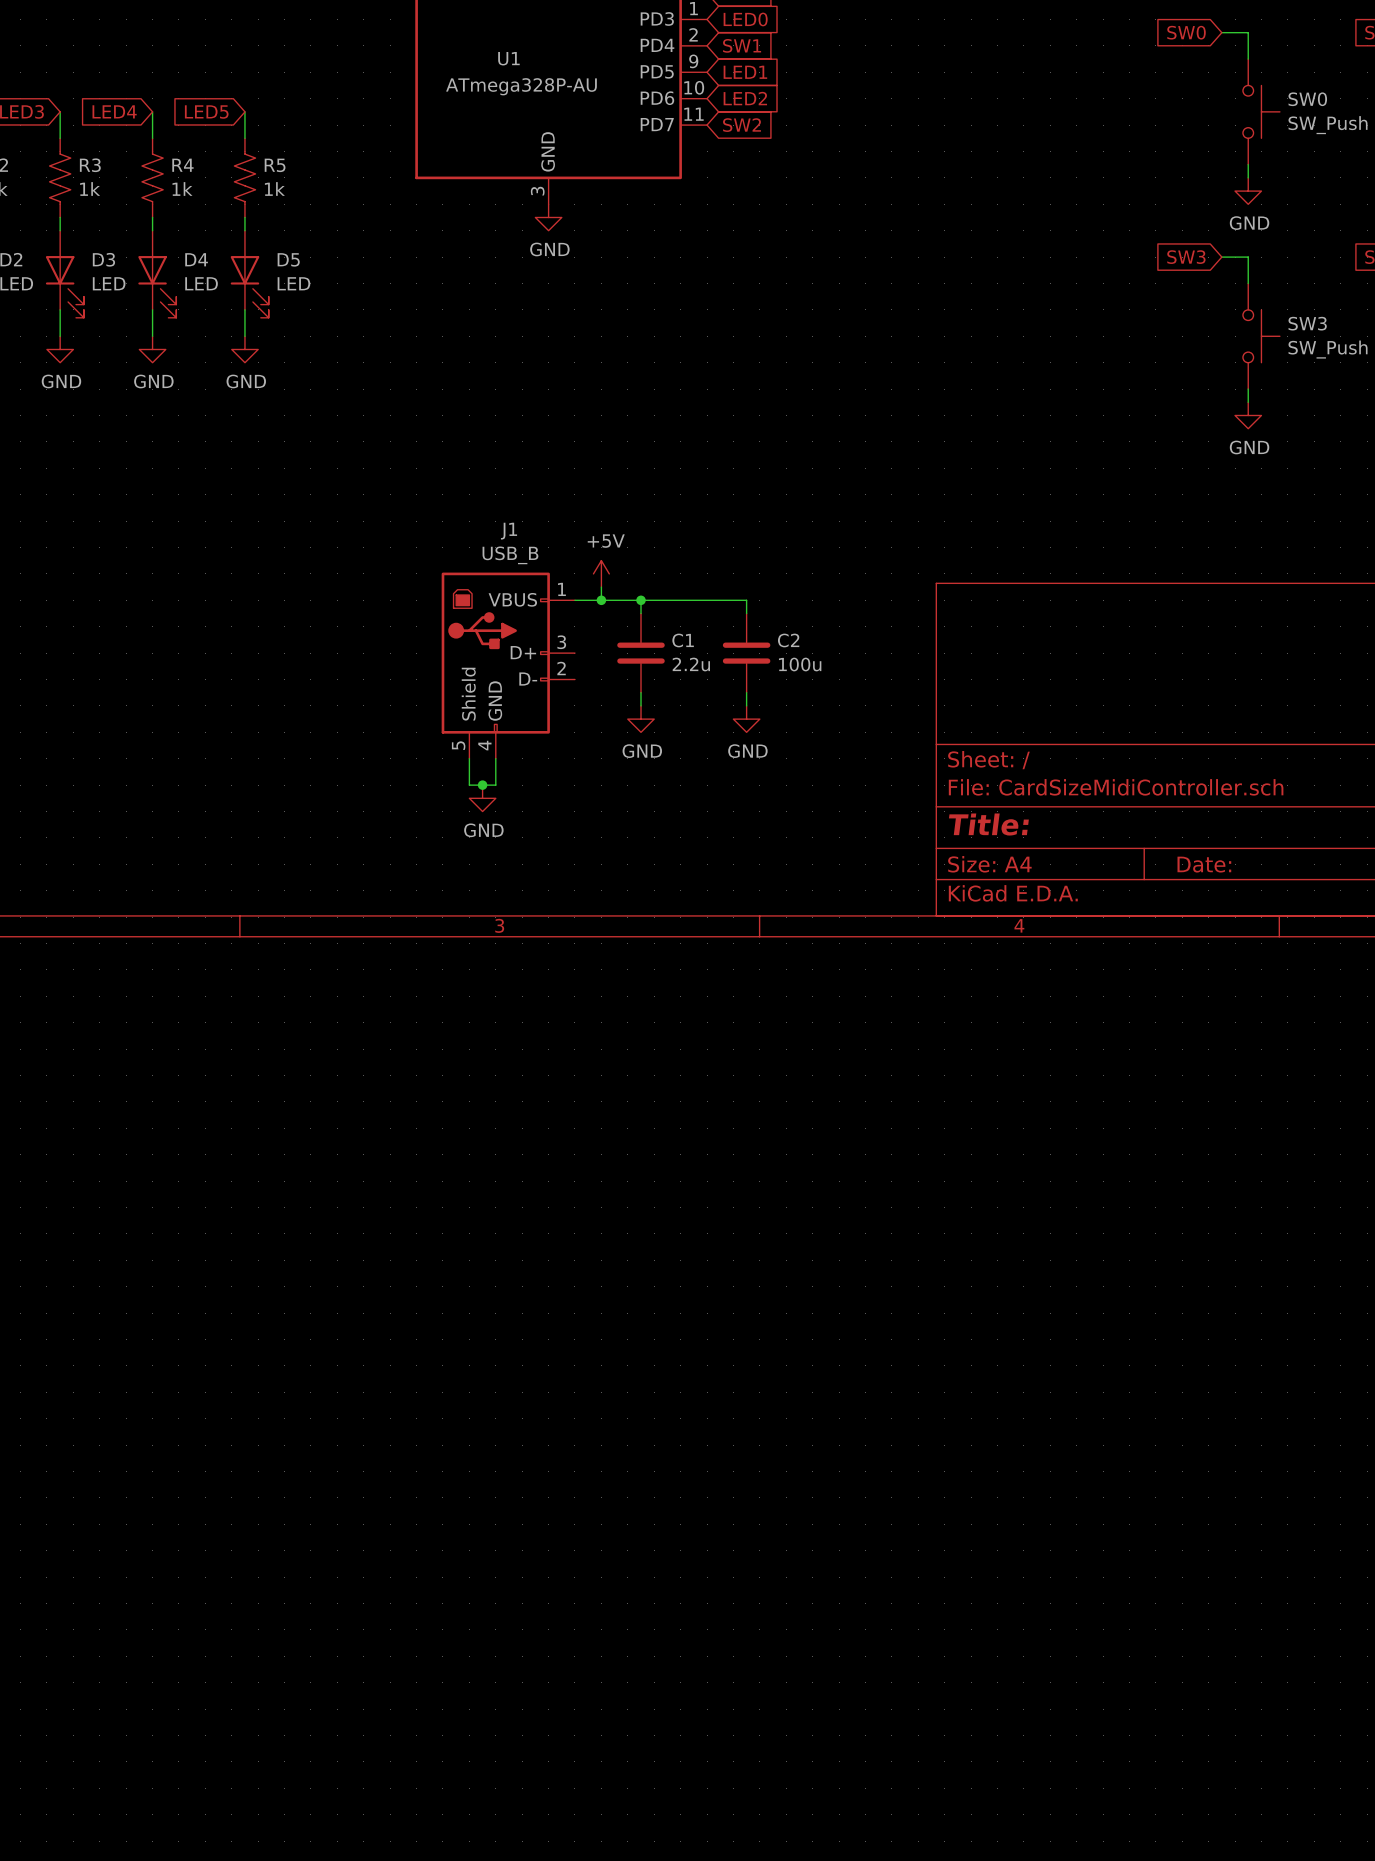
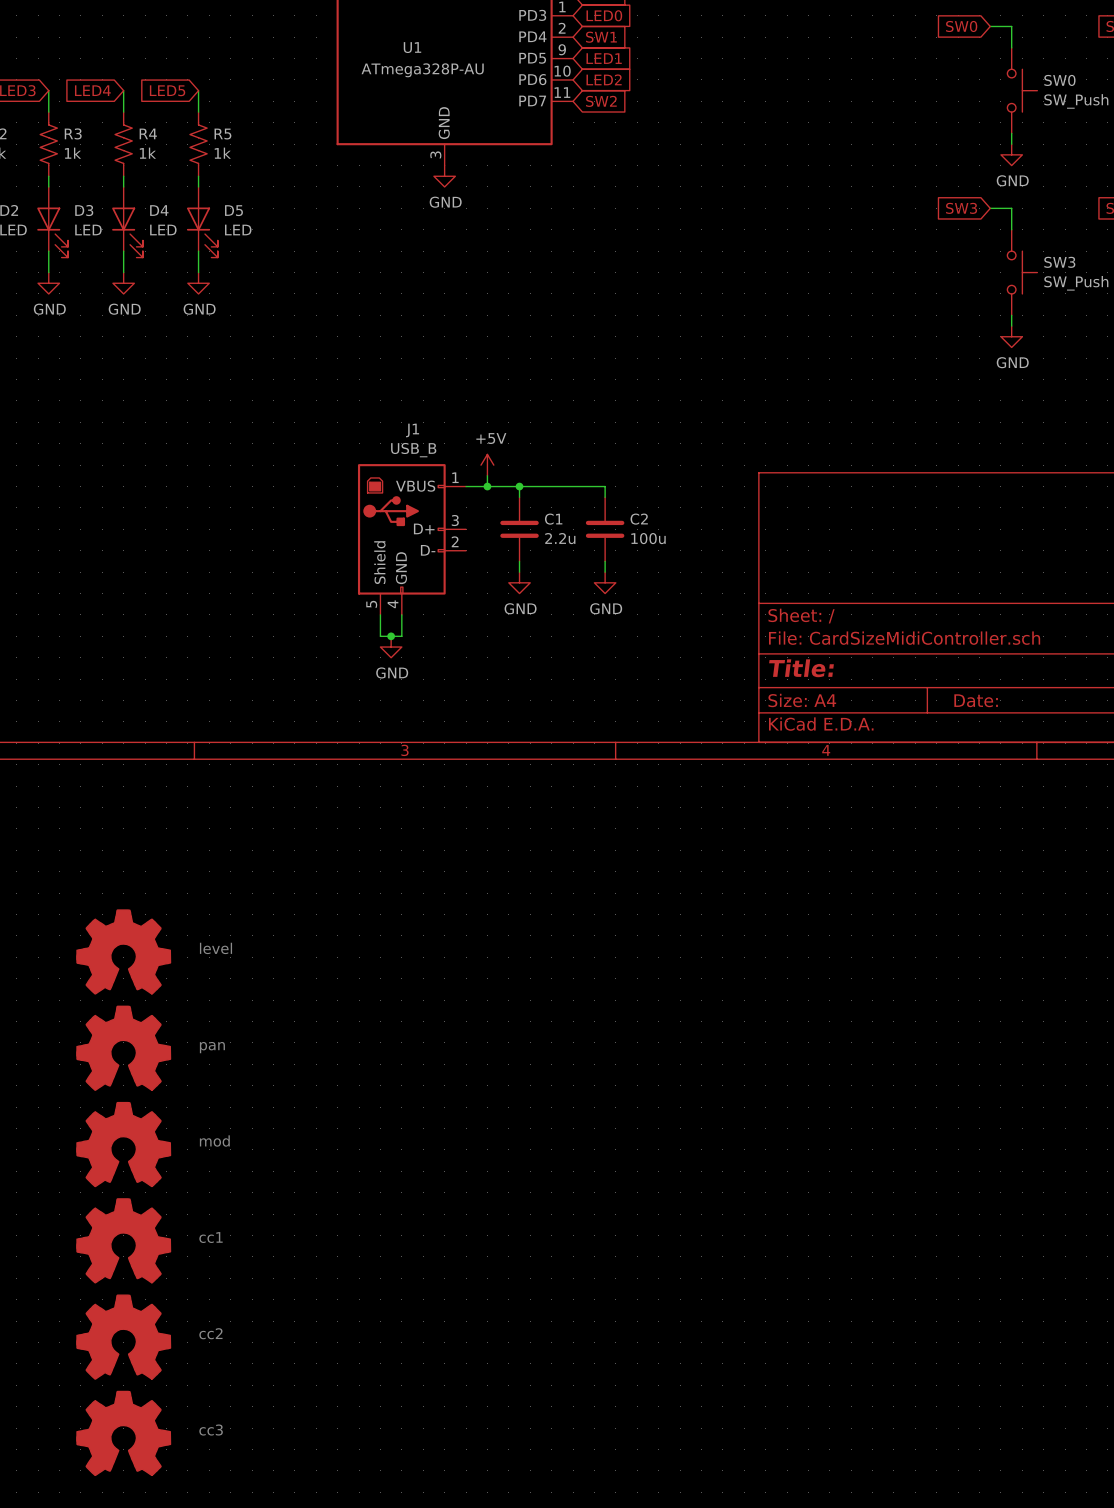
text: none -> level (216, 948)
part: none -> (123, 951)
text: none -> pan (212, 1047)
part: none -> (123, 1048)
text: none -> mod (214, 1141)
part: none -> (123, 1144)
text: none -> cc1 (211, 1237)
part: none -> (123, 1240)
text: none -> cc2 (210, 1333)
part: none -> (123, 1337)
text: none -> cc3 (211, 1430)
part: none -> (123, 1433)

